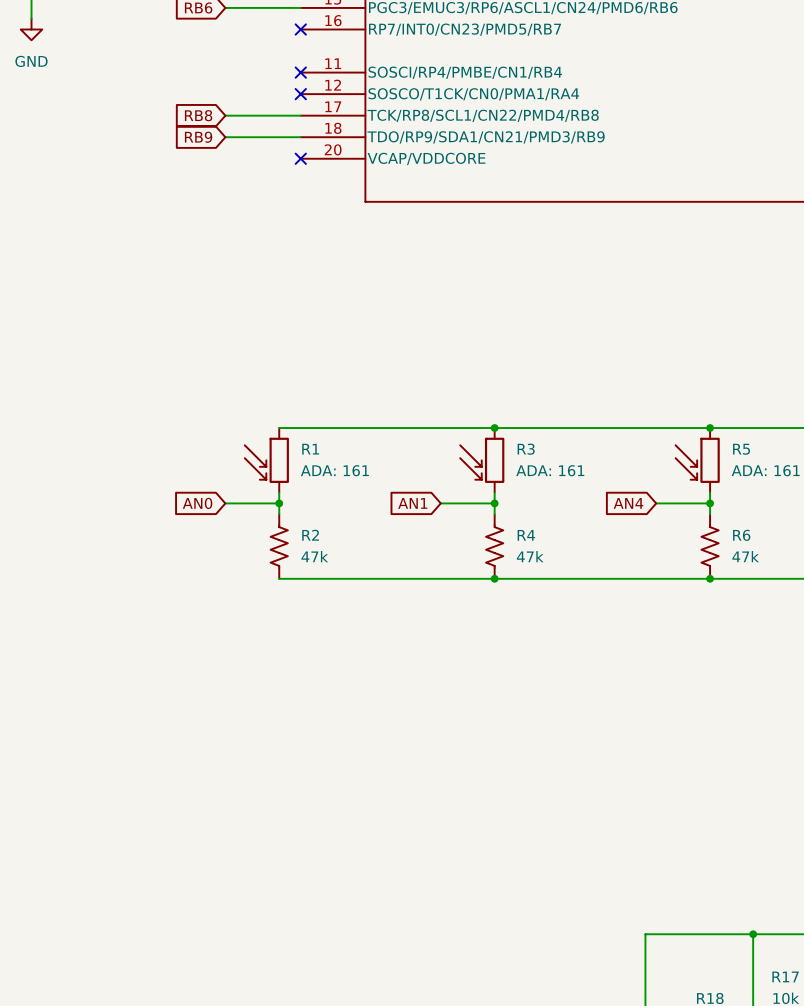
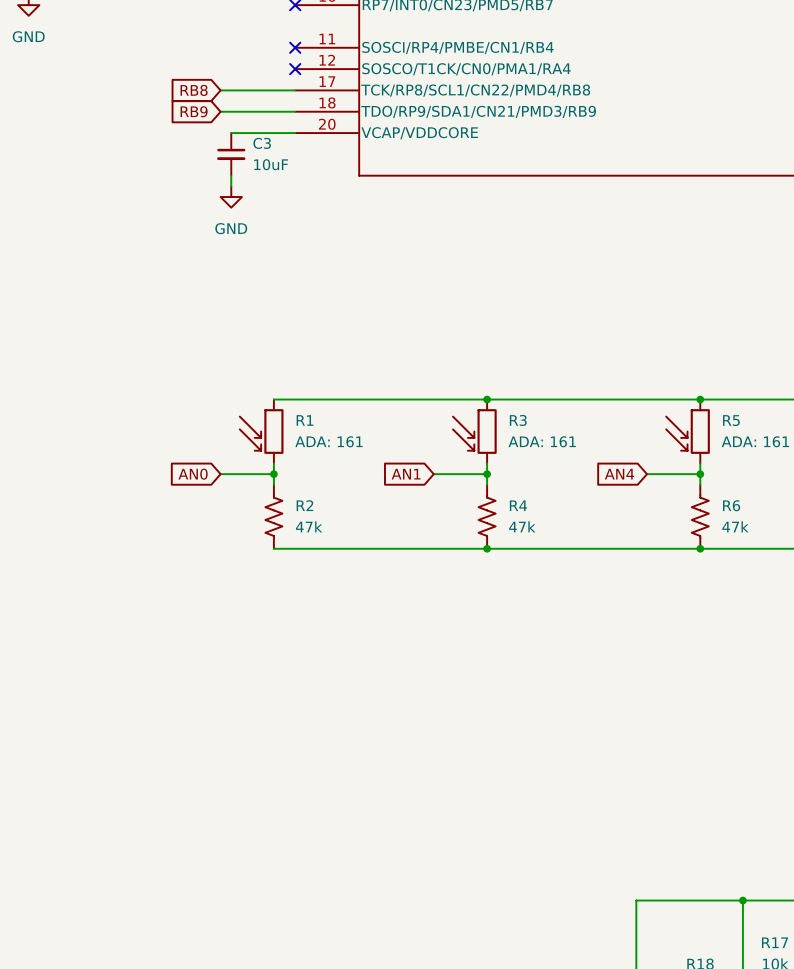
wire: none -> (231, 133) (295, 133)
no-connect mark: (300, 158) -> none
C3: none -> 10uF (231, 154)
wire: none -> (231, 175) (231, 186)
power symbol: none -> GND (231, 197)

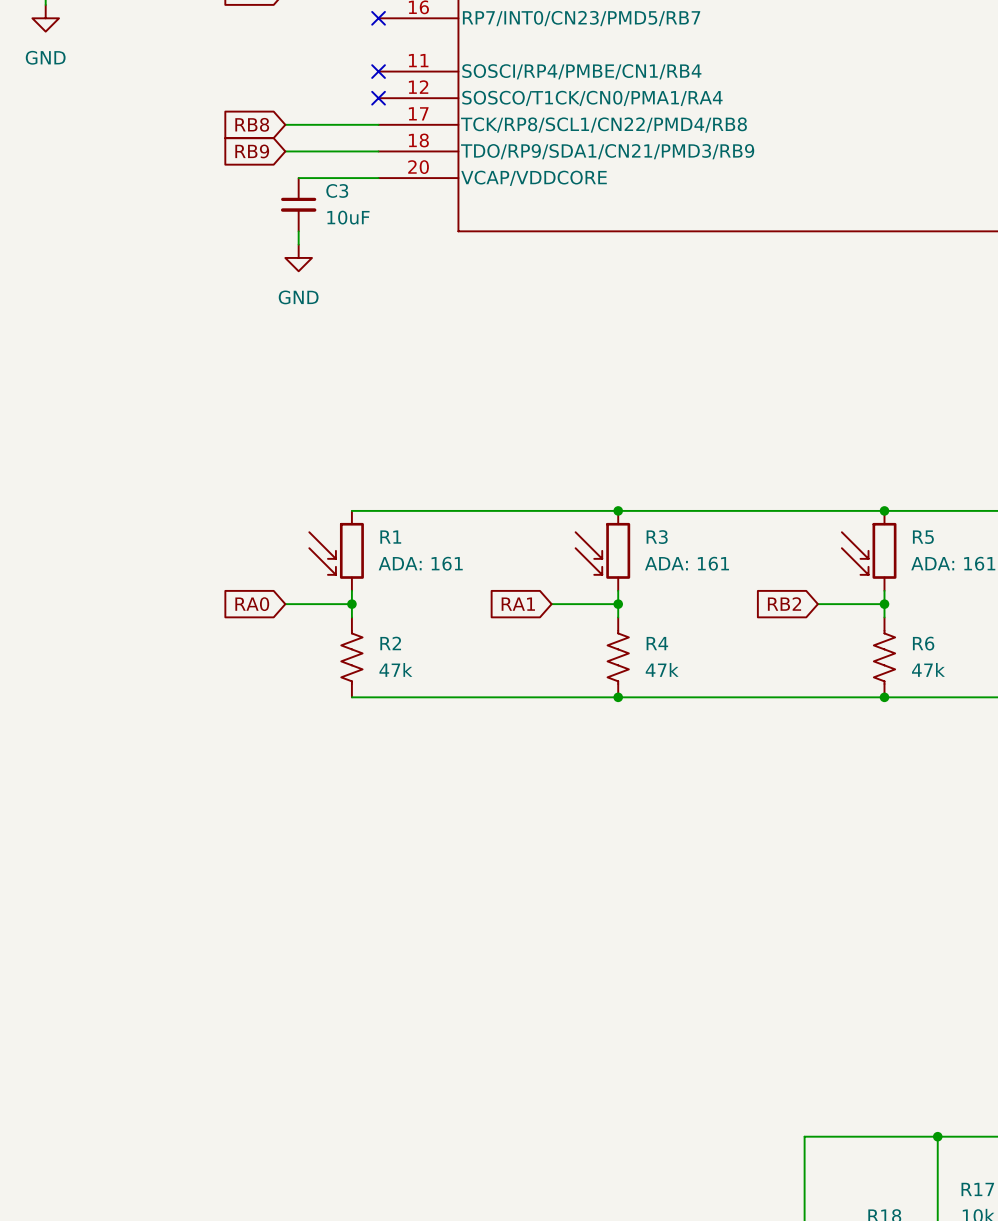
global label: AN0 (193, 474) -> RA0 (252, 604)
global label: AN1 (406, 474) -> RA1 (518, 604)
global label: AN4 (619, 474) -> RB2 (784, 604)

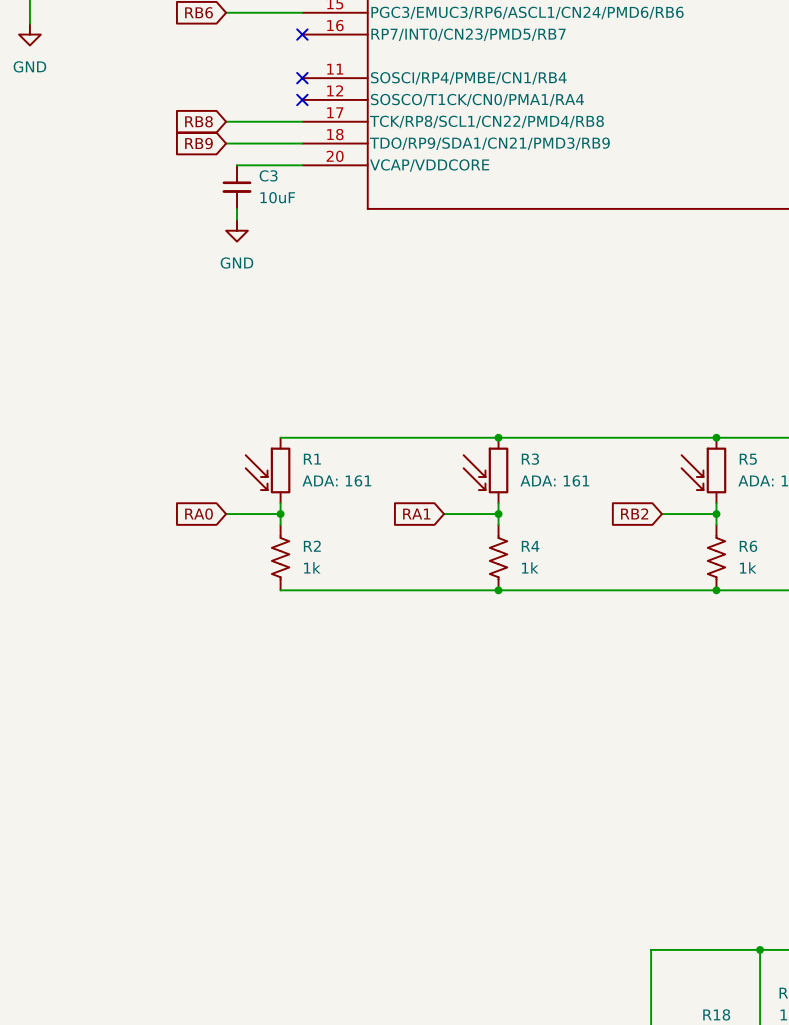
R2 value: 47k (395, 669) -> 1k (312, 567)
R4 value: 47k (662, 669) -> 1k (530, 567)
R6 value: 47k (928, 669) -> 1k (748, 567)

